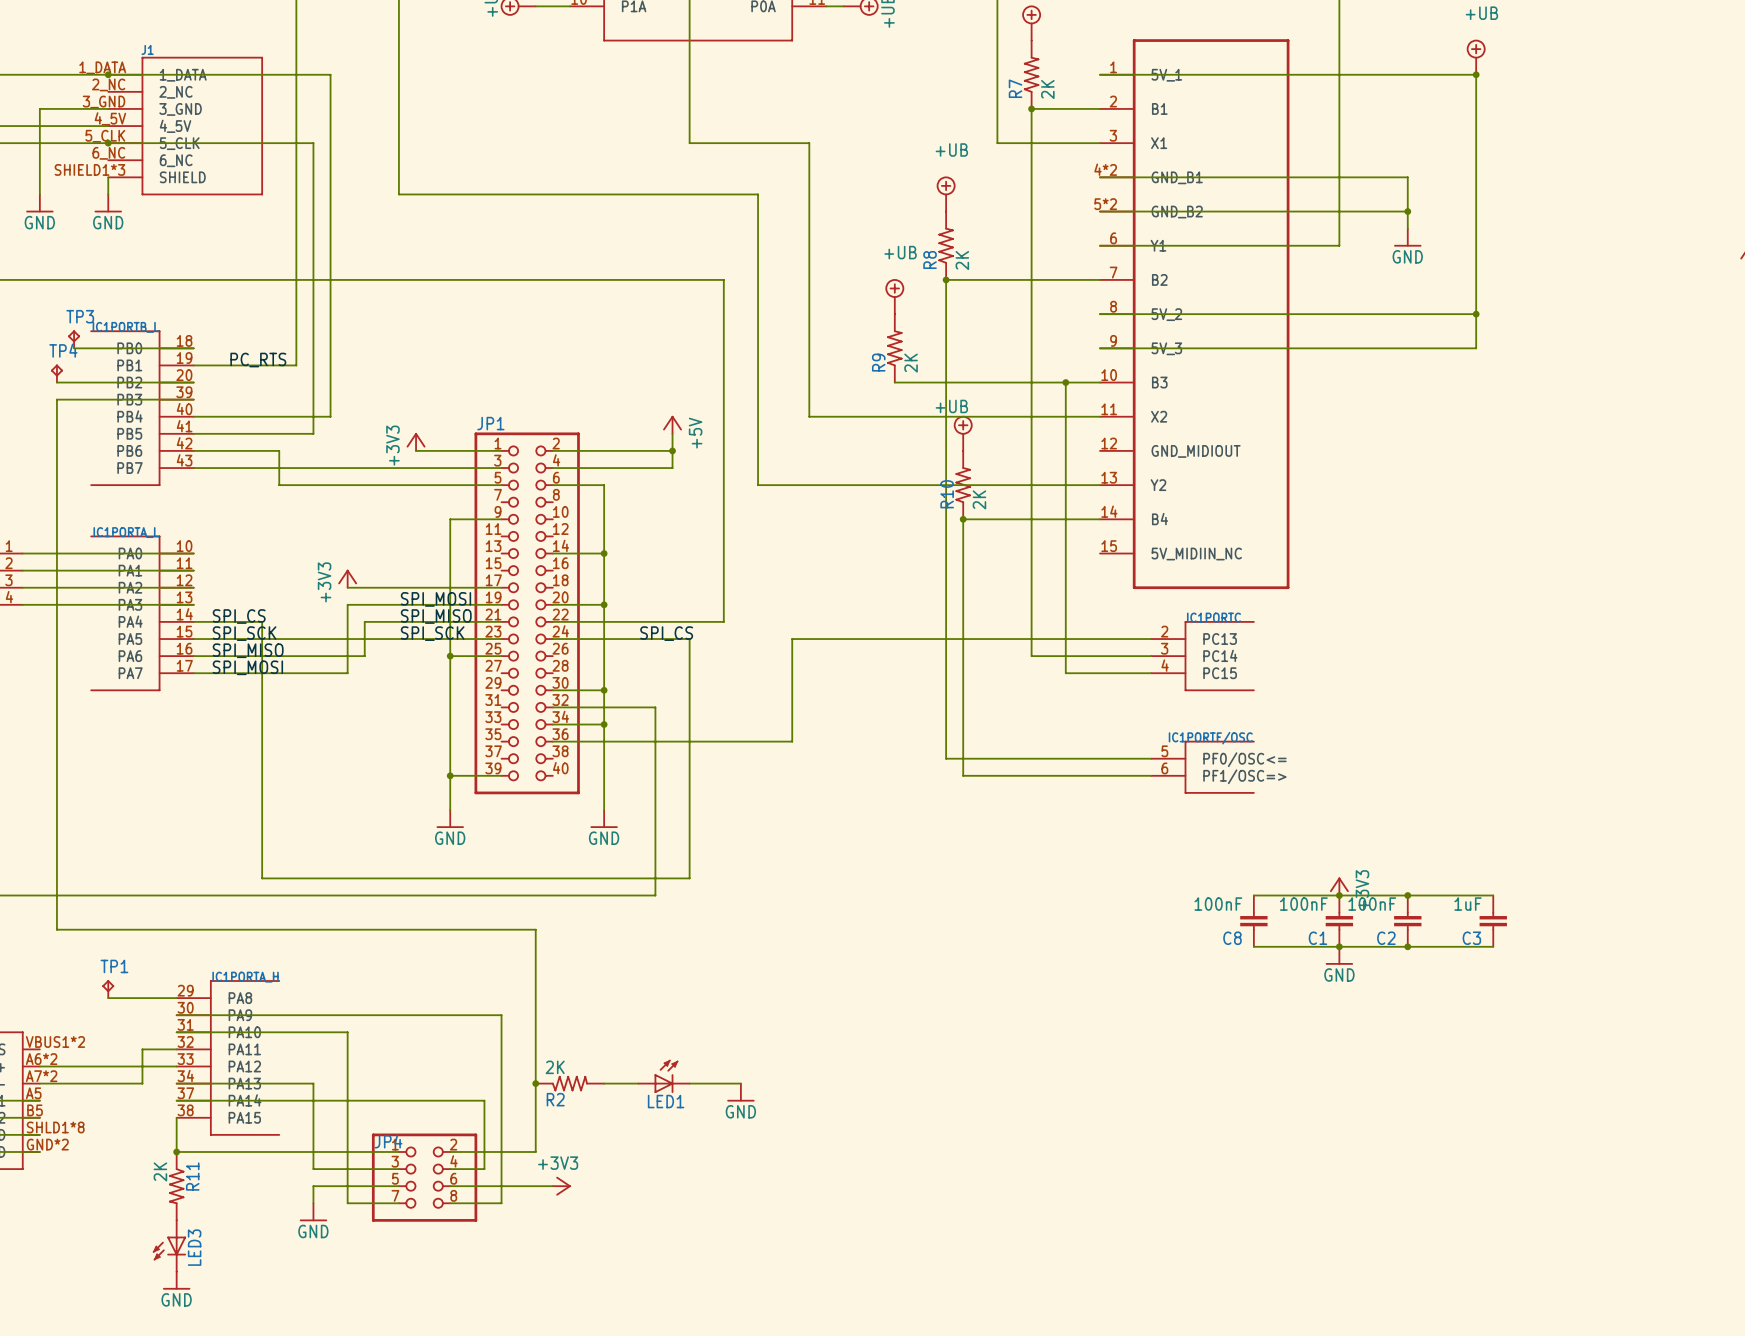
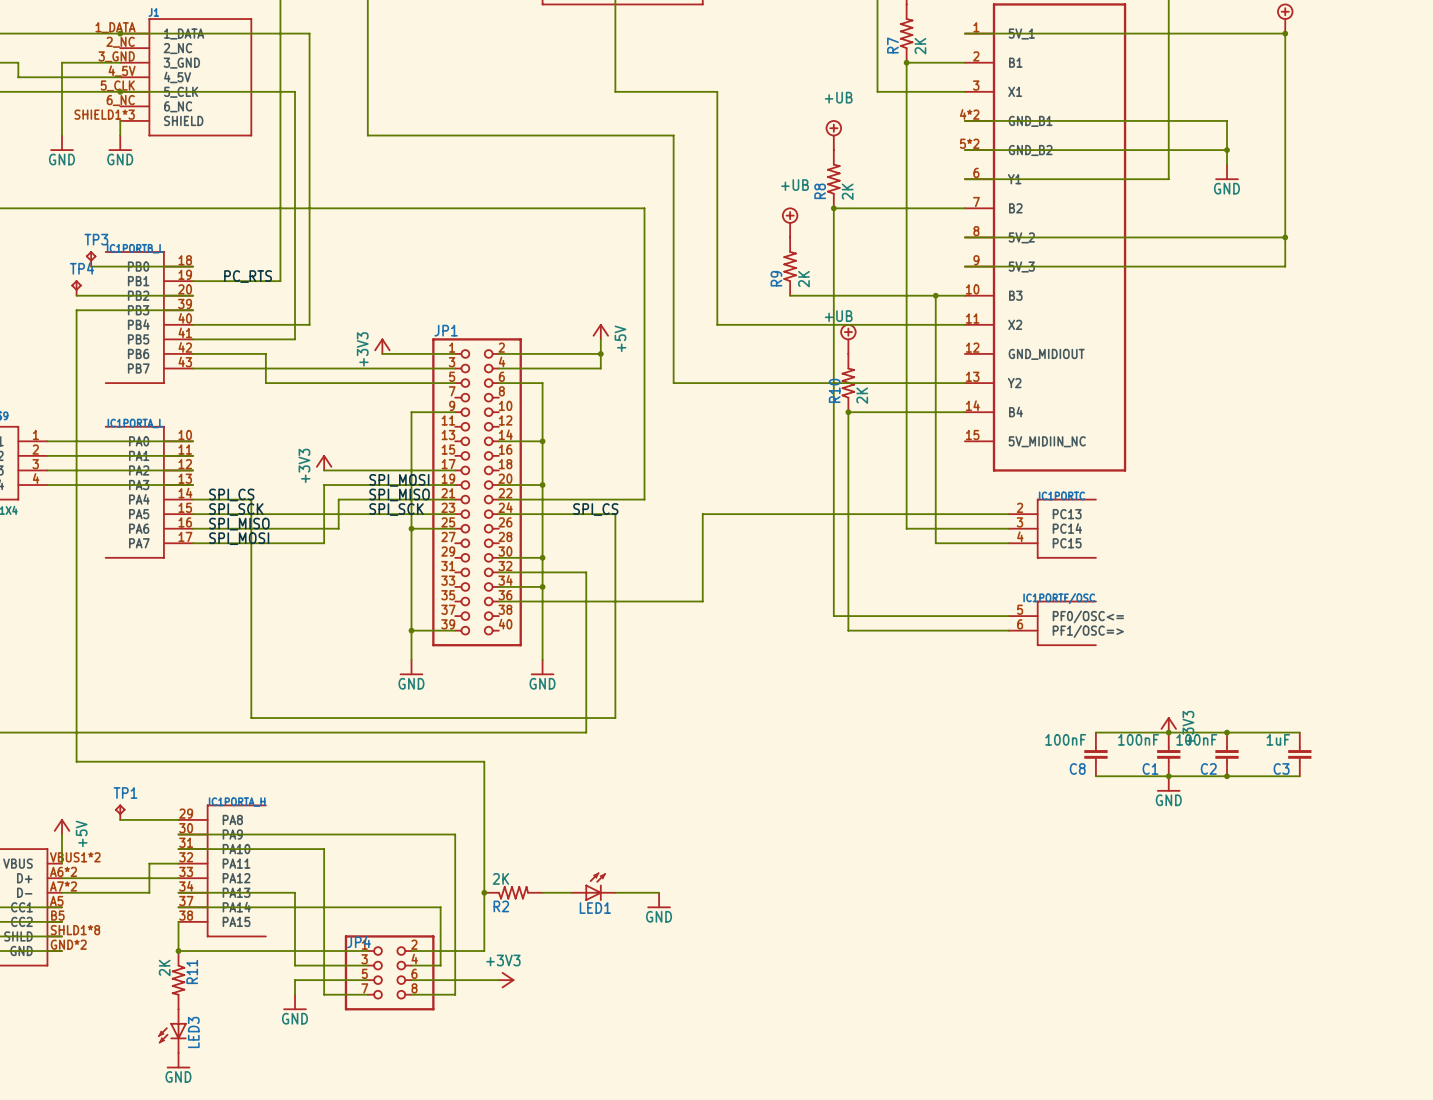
power symbol: none -> +5V (62, 826)
wire: none -> (62, 834) (62, 863)

